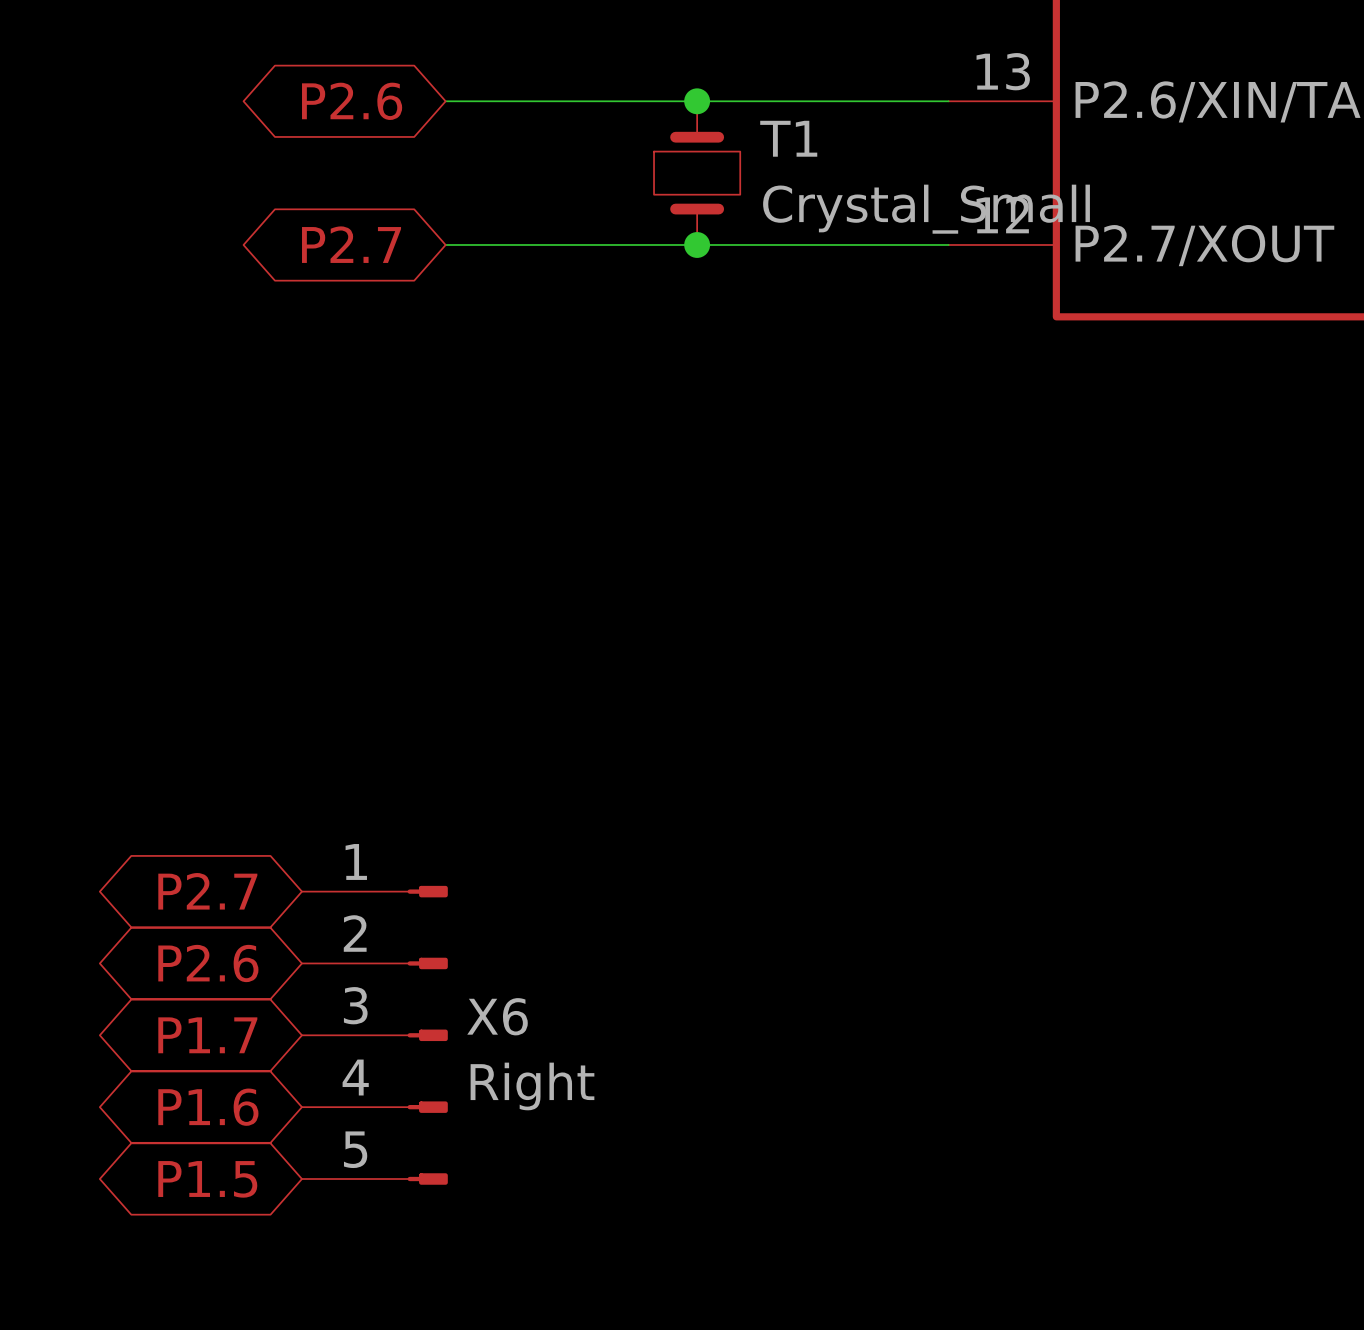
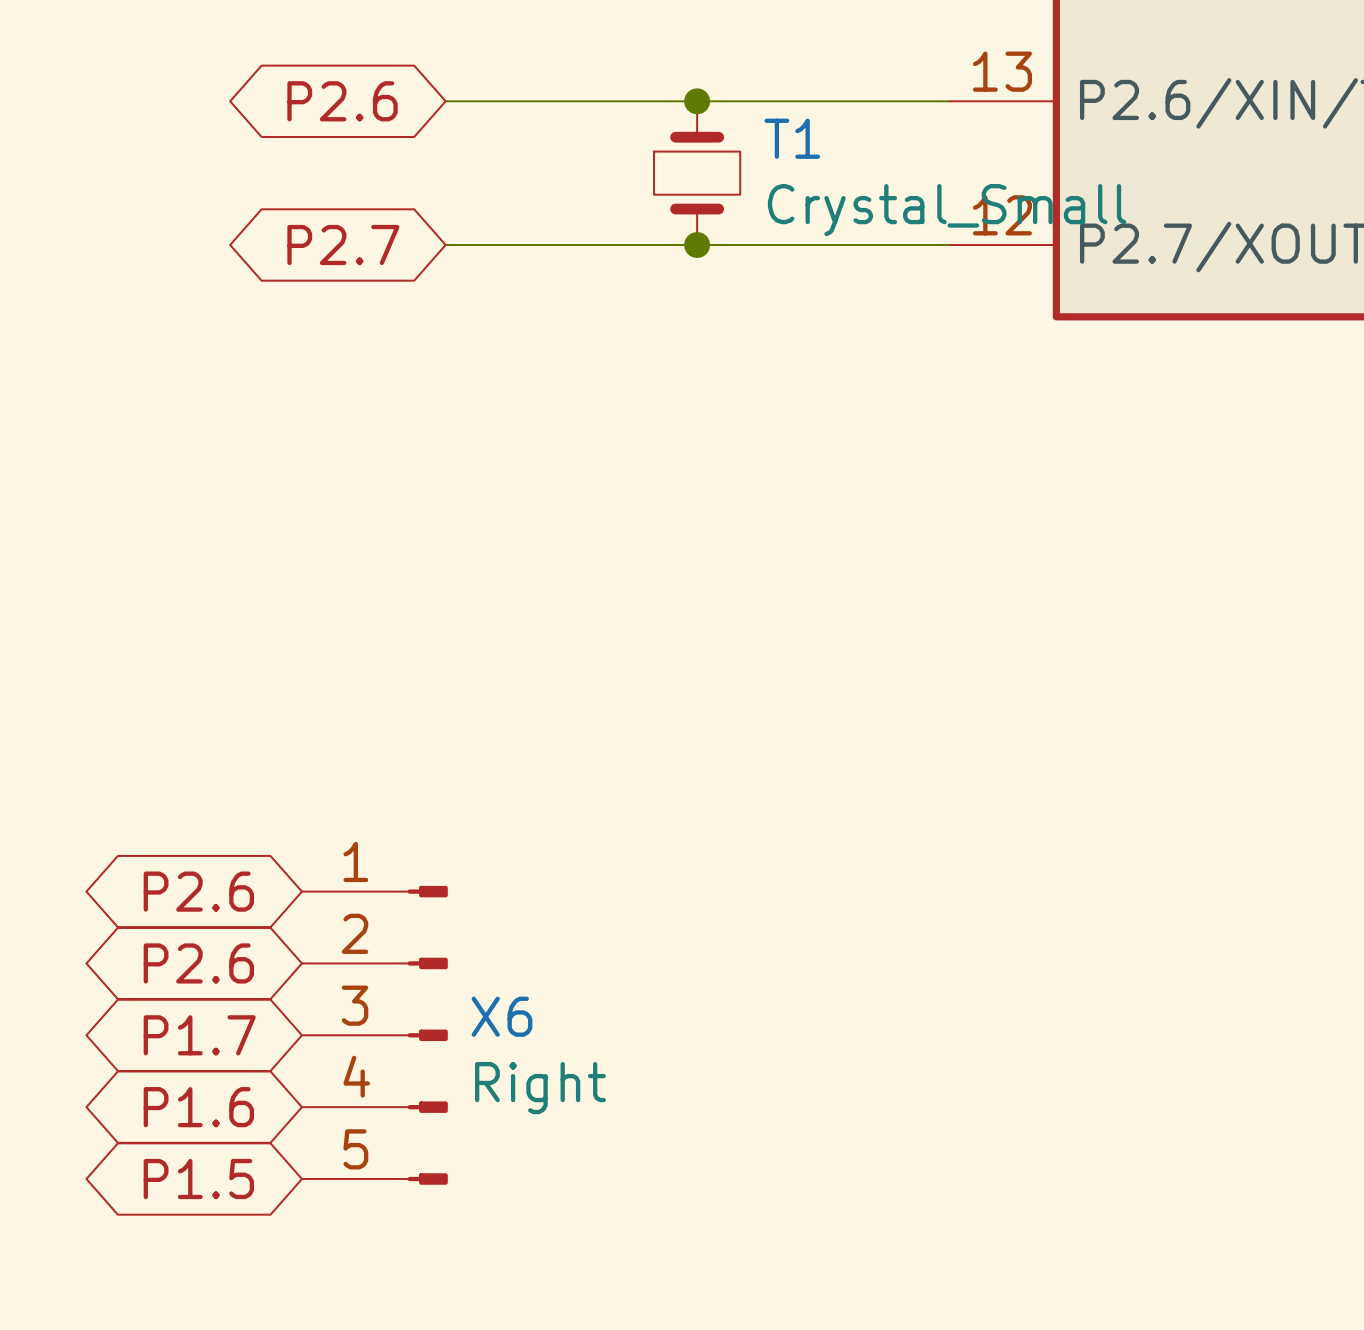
global label: P2.7 (207, 891) -> P2.6 (198, 891)

